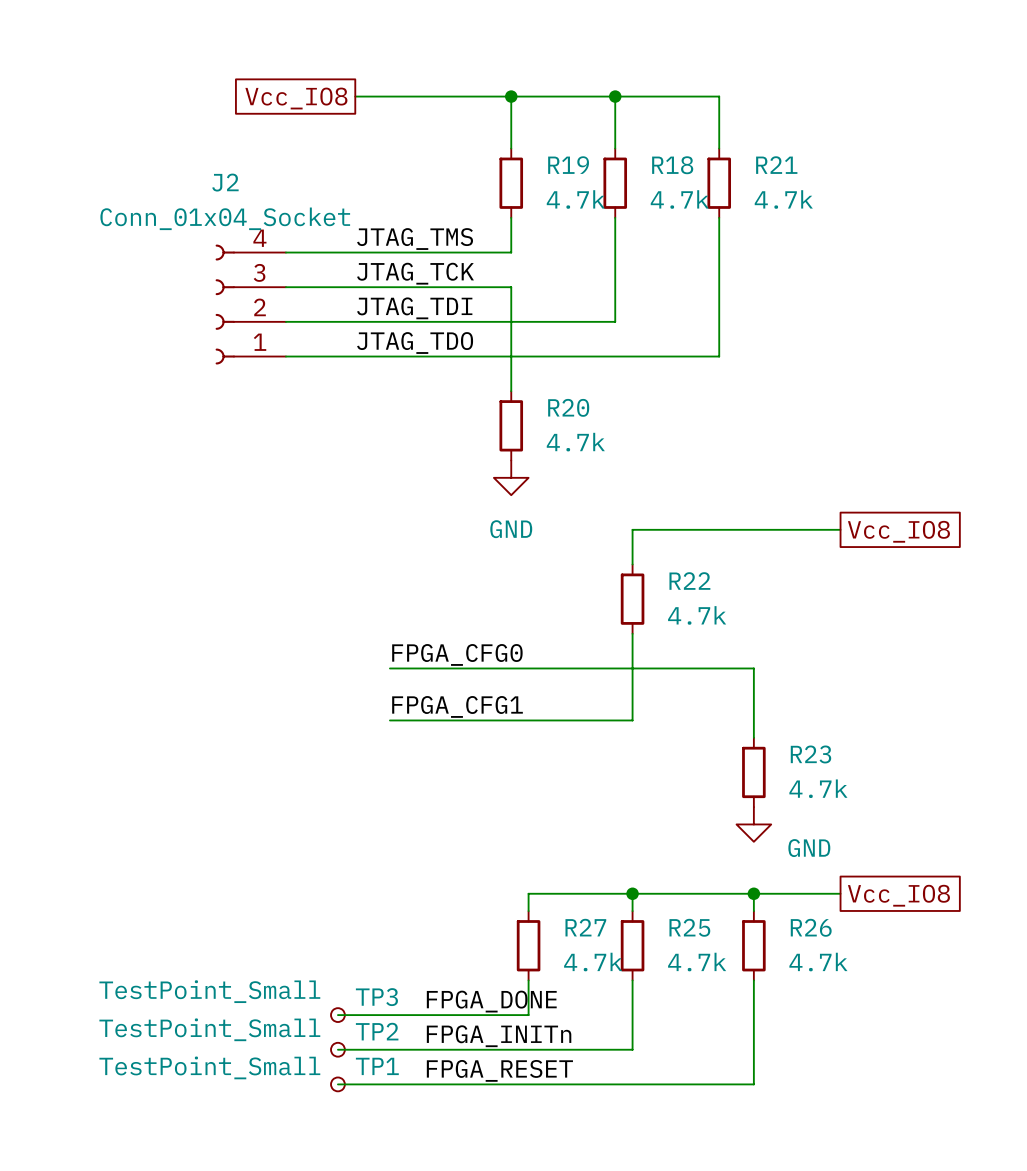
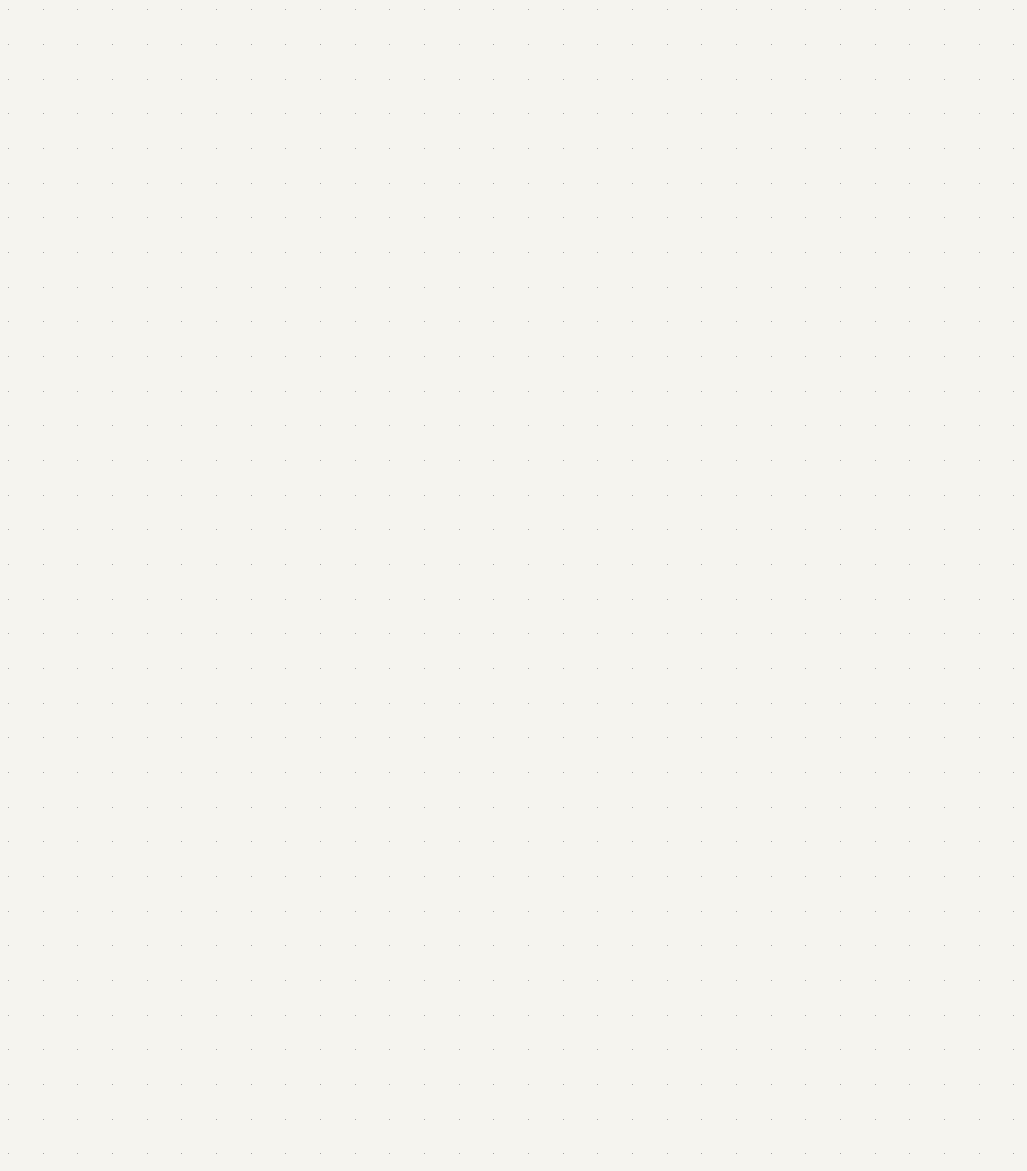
wire: (355, 96) (719, 96) (719, 148) -> none
wire: (511, 96) (511, 148) -> none
junction: (511, 96) -> none
wire: (615, 96) (615, 148) -> none
junction: (615, 96) -> none
global label: Vcc_IO8 (296, 98) -> none
R19: 4.7k (511, 183) -> none
R18: 4.7k (615, 183) -> none
R21: 4.7k (719, 183) -> none
wire: (511, 217) (511, 252) (285, 252) -> none
wire: (615, 217) (615, 321) (285, 321) -> none
wire: (719, 217) (719, 356) (285, 356) -> none
label: JTAG_TMS (415, 239) -> none
label: JTAG_TCK (415, 273) -> none
wire: (285, 287) (511, 287) (511, 391) -> none
J2: Conn_01x04_Socket (250, 304) -> none
label: JTAG_TDI (414, 308) -> none
label: JTAG_TDO (415, 343) -> none
R20: 4.7k (511, 425) -> none
power symbol: GND (511, 477) -> none
wire: (840, 529) (632, 529) (632, 564) -> none
global label: Vcc_IO8 (898, 531) -> none
R22: 4.7k (632, 599) -> none
wire: (632, 633) (632, 720) (389, 720) -> none
label: FPGA_CFG0 (457, 654) -> none
wire: (389, 668) (753, 668) (753, 737) -> none
label: FPGA_CFG1 (457, 706) -> none
R23: 4.7k (753, 772) -> none
power symbol: GND (753, 824) -> none
wire: (632, 893) (632, 911) -> none
junction: (632, 893) -> none
wire: (753, 893) (753, 911) -> none
junction: (753, 893) -> none
wire: (840, 893) (528, 893) (528, 911) -> none
global label: Vcc_IO8 (898, 895) -> none
R27: 4.7k (528, 945) -> none
R25: 4.7k (632, 945) -> none
R26: 4.7k (753, 945) -> none
wire: (528, 980) (528, 1015) (337, 1015) -> none
wire: (632, 980) (632, 1049) (337, 1049) -> none
wire: (753, 980) (753, 1084) (337, 1084) -> none
label: FPGA_DONE (491, 1001) -> none
TP3: TestPoint_Small (337, 1015) -> none
label: FPGA_INITn (499, 1036) -> none
TP2: TestPoint_Small (337, 1049) -> none
label: FPGA_RESET (499, 1070) -> none
TP1: TestPoint_Small (337, 1084) -> none

